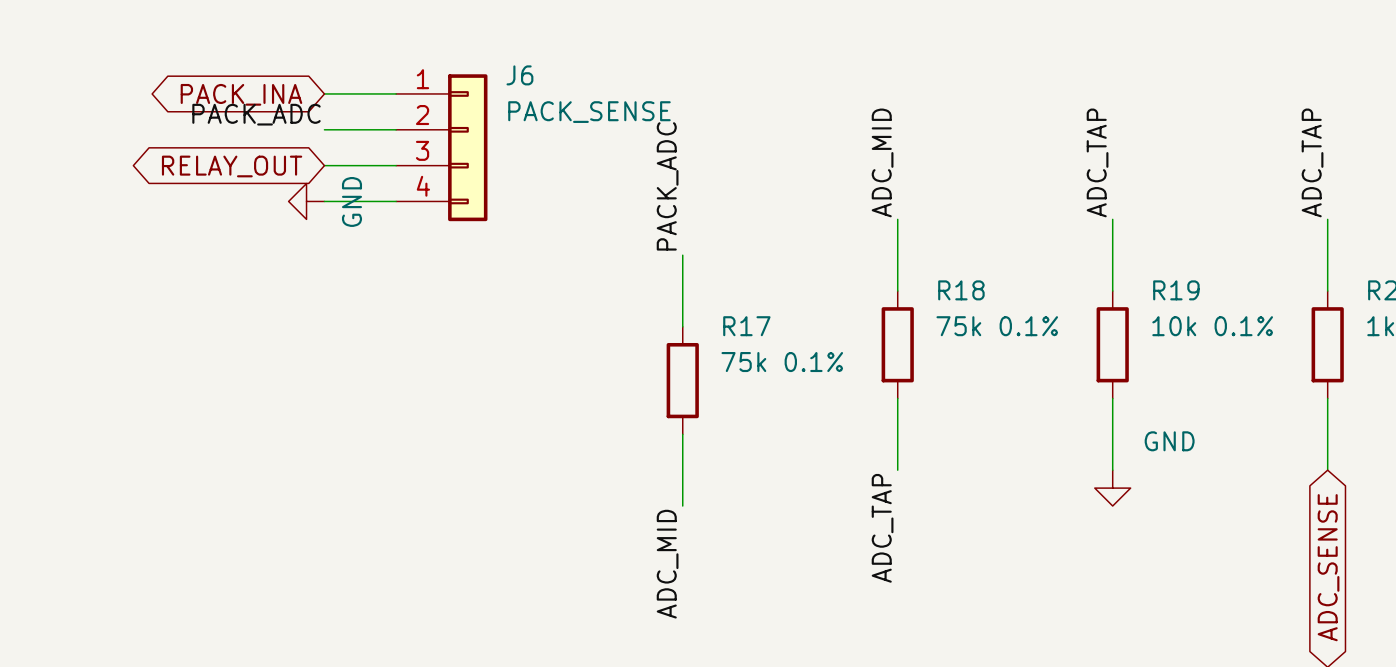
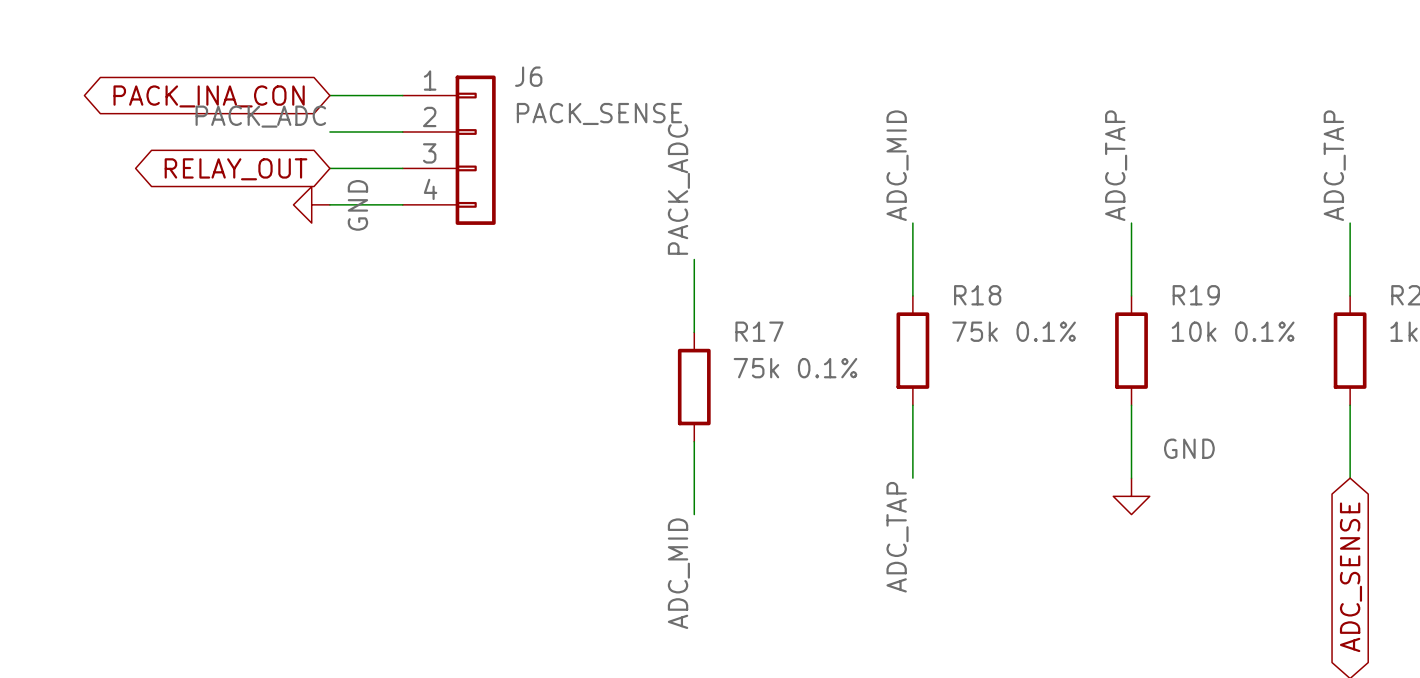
global label: PACK_INA (241, 94) -> PACK_INA_CON (209, 96)

